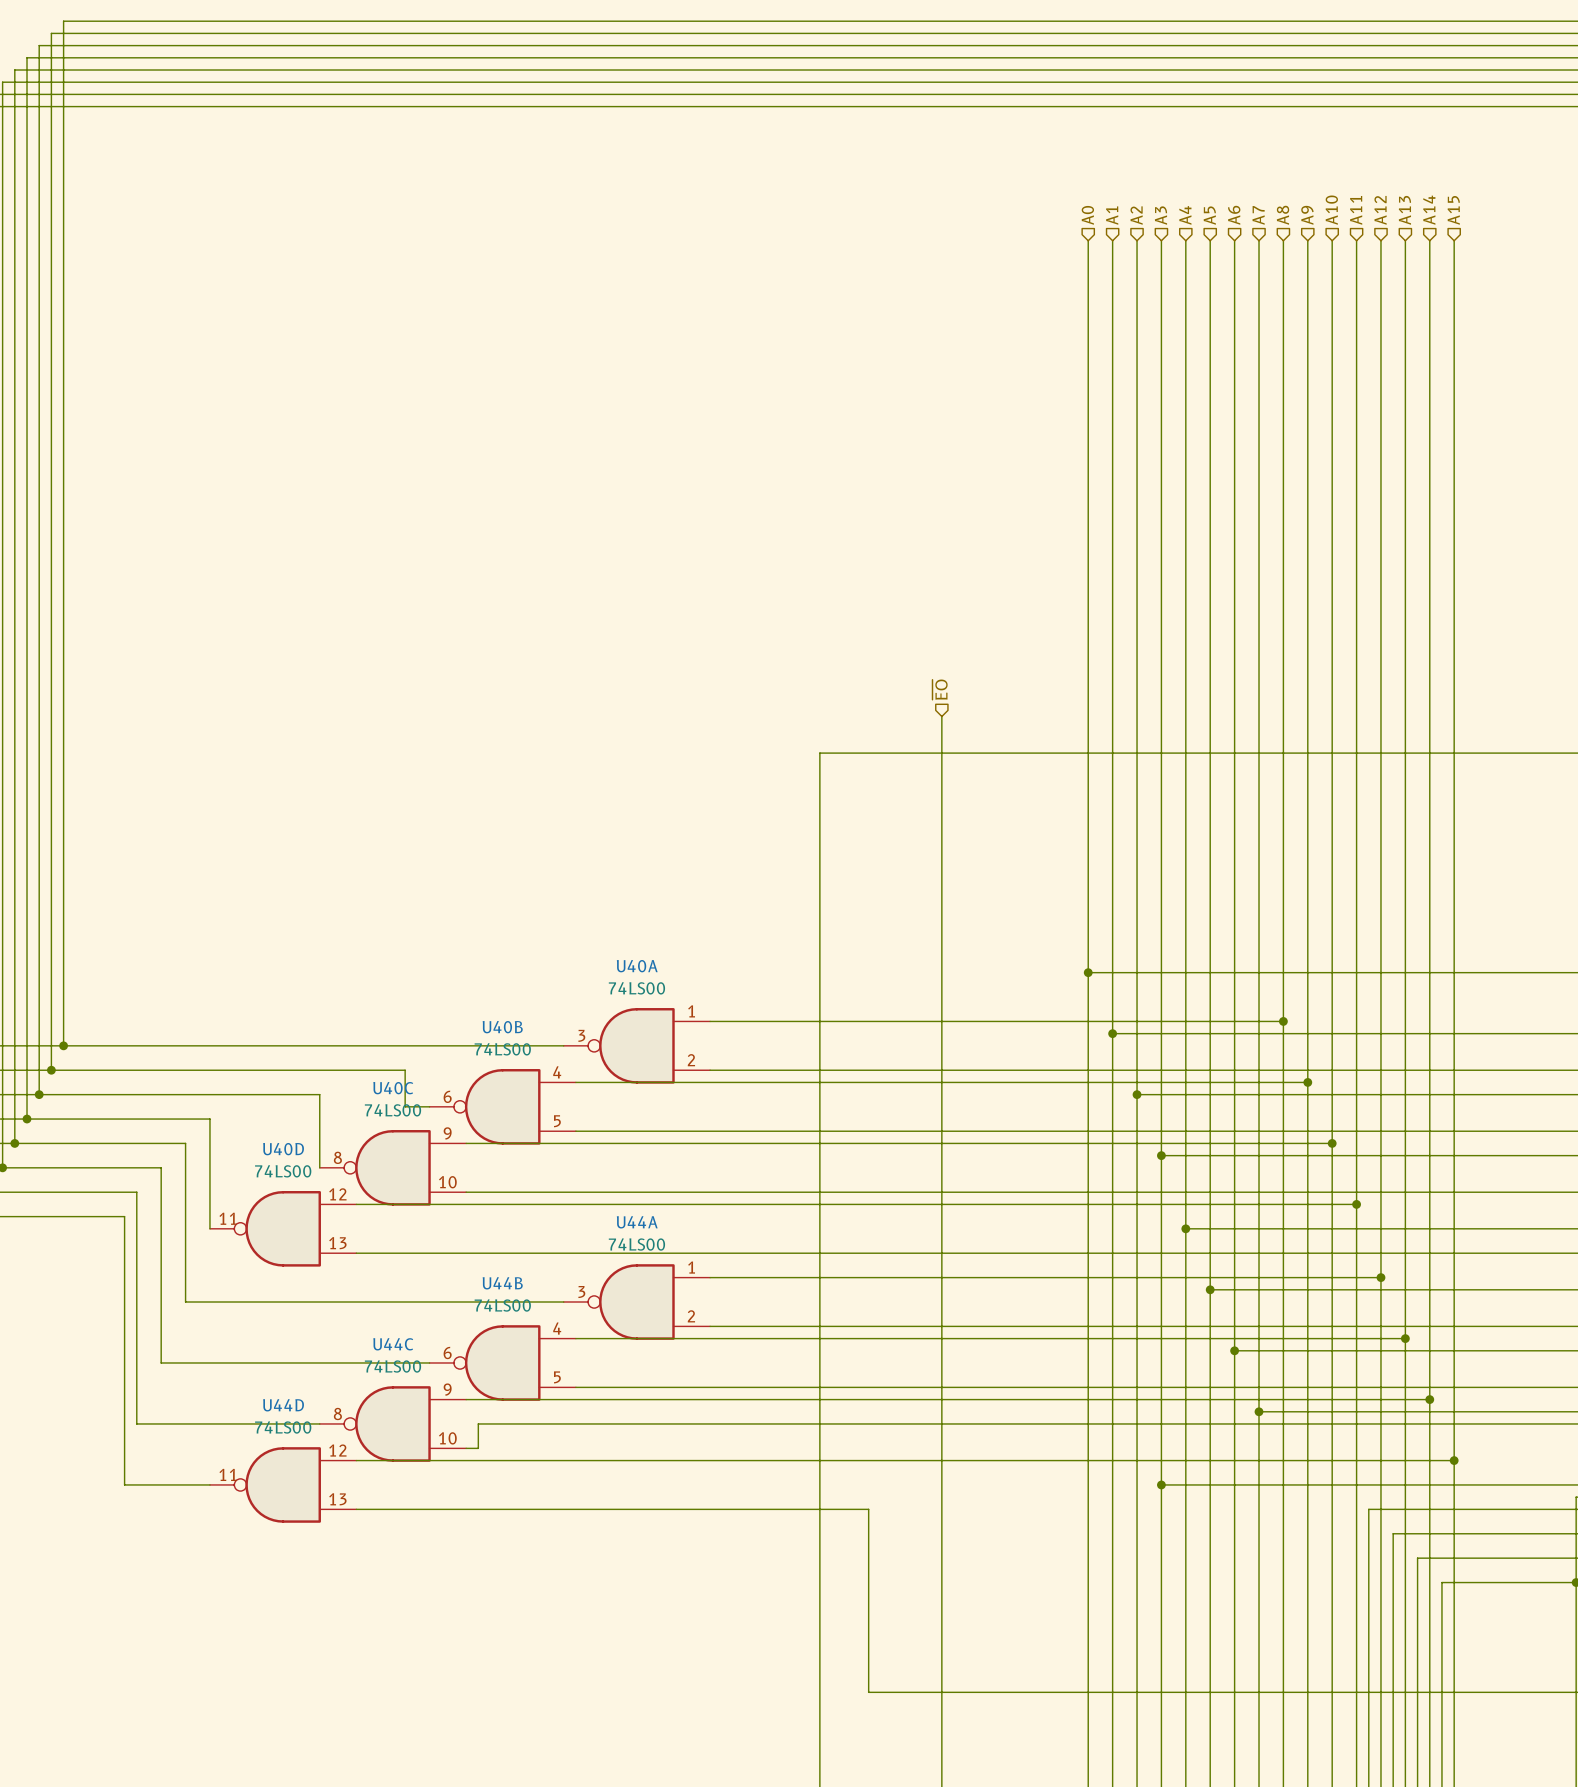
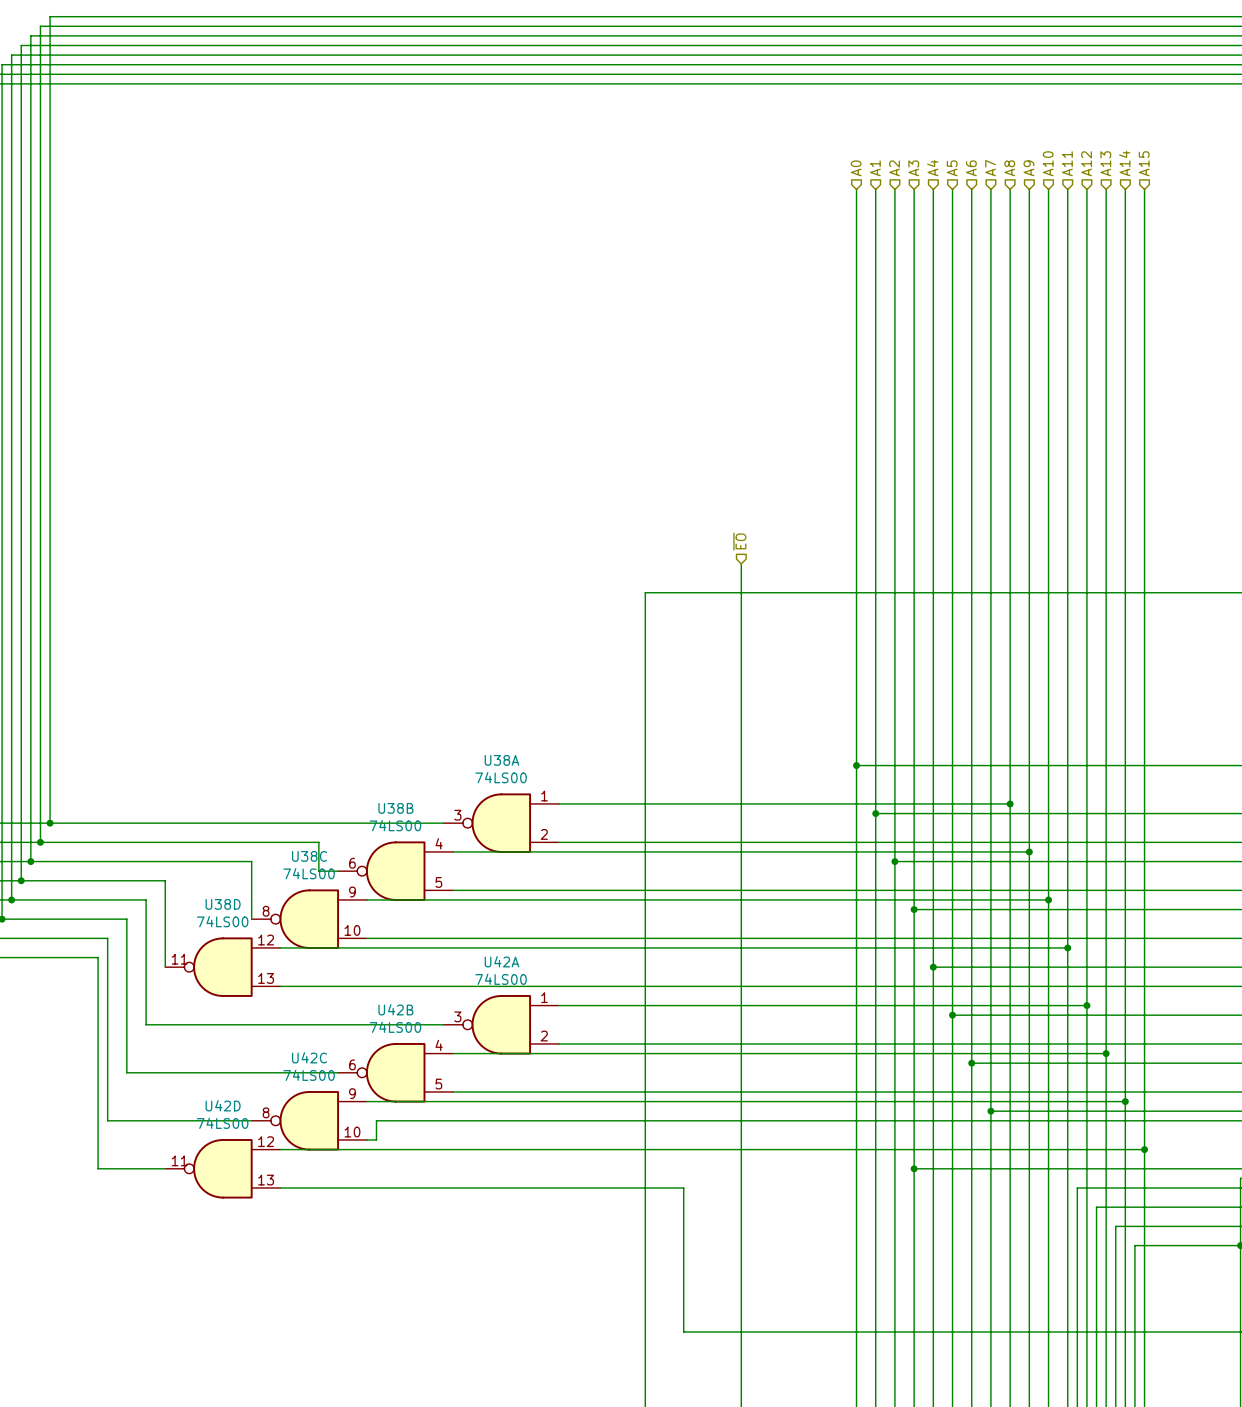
U40A name: U40A (637, 966) -> U38A (501, 760)
U40B name: U40B (502, 1027) -> U38B (395, 808)
U40C name: U40C (393, 1088) -> U38C (309, 856)
U40D name: U40D (283, 1149) -> U38D (223, 904)
U44A name: U44A (637, 1222) -> U42A (501, 961)
U44B name: U44B (502, 1283) -> U42B (395, 1009)
U44C name: U44C (393, 1344) -> U42C (309, 1057)
U44D name: U44D (283, 1405) -> U42D (223, 1105)

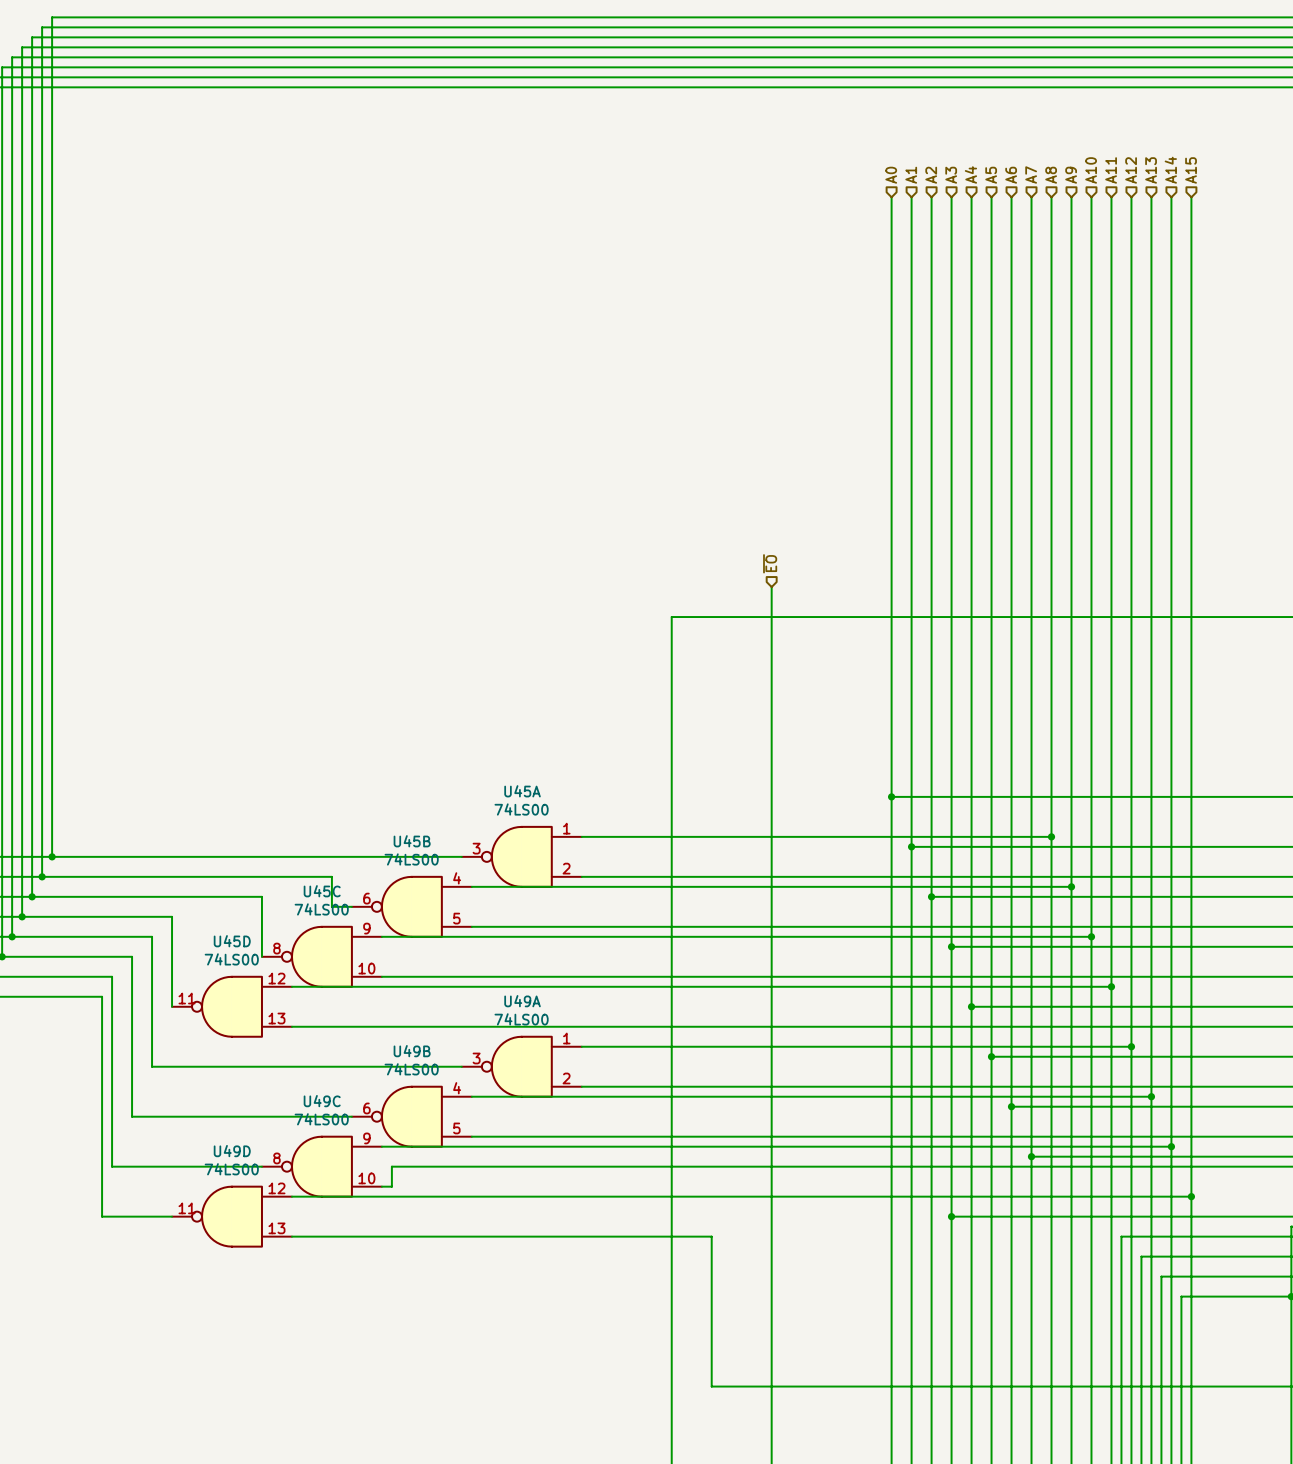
U38A name: U38A (501, 760) -> U45A (522, 791)
U38B name: U38B (395, 808) -> U45B (412, 841)
U38C name: U38C (309, 856) -> U45C (322, 891)
U38D name: U38D (223, 904) -> U45D (232, 941)
U42A name: U42A (501, 961) -> U49A (522, 1001)
U42B name: U42B (395, 1009) -> U49B (412, 1051)
U42C name: U42C (309, 1057) -> U49C (322, 1101)
U42D name: U42D (223, 1105) -> U49D (232, 1151)

